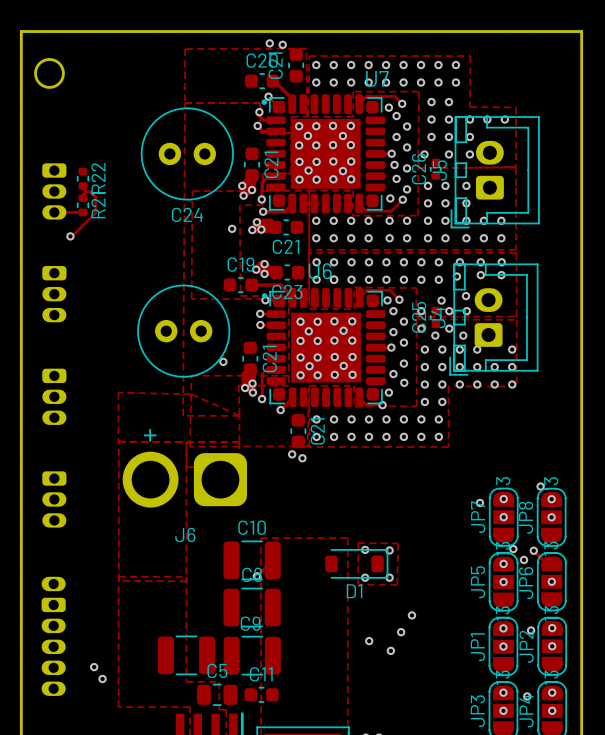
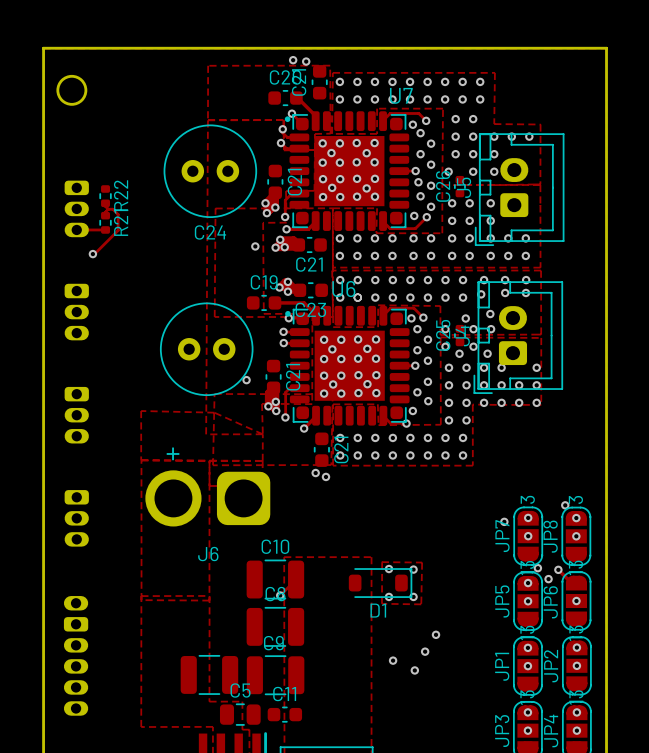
via: (531, 630) -> none
via: (94, 667) -> none
via: (102, 678) -> none
via: (527, 696) -> none

